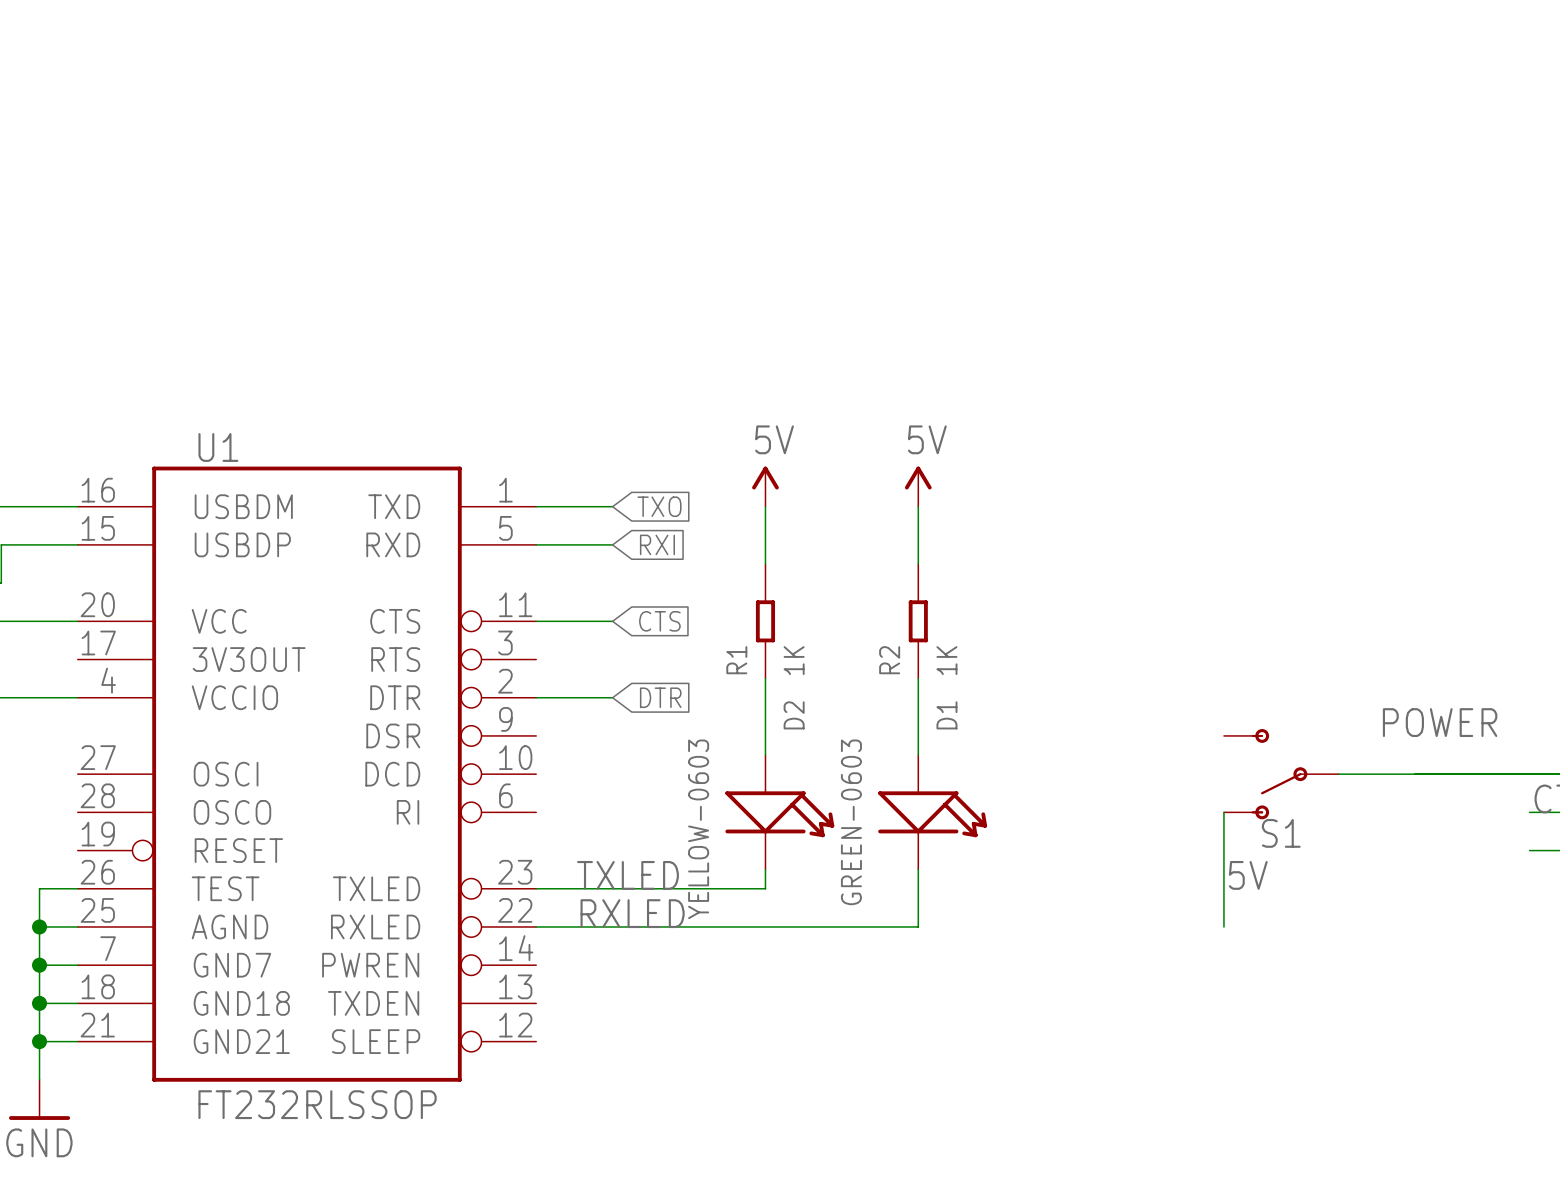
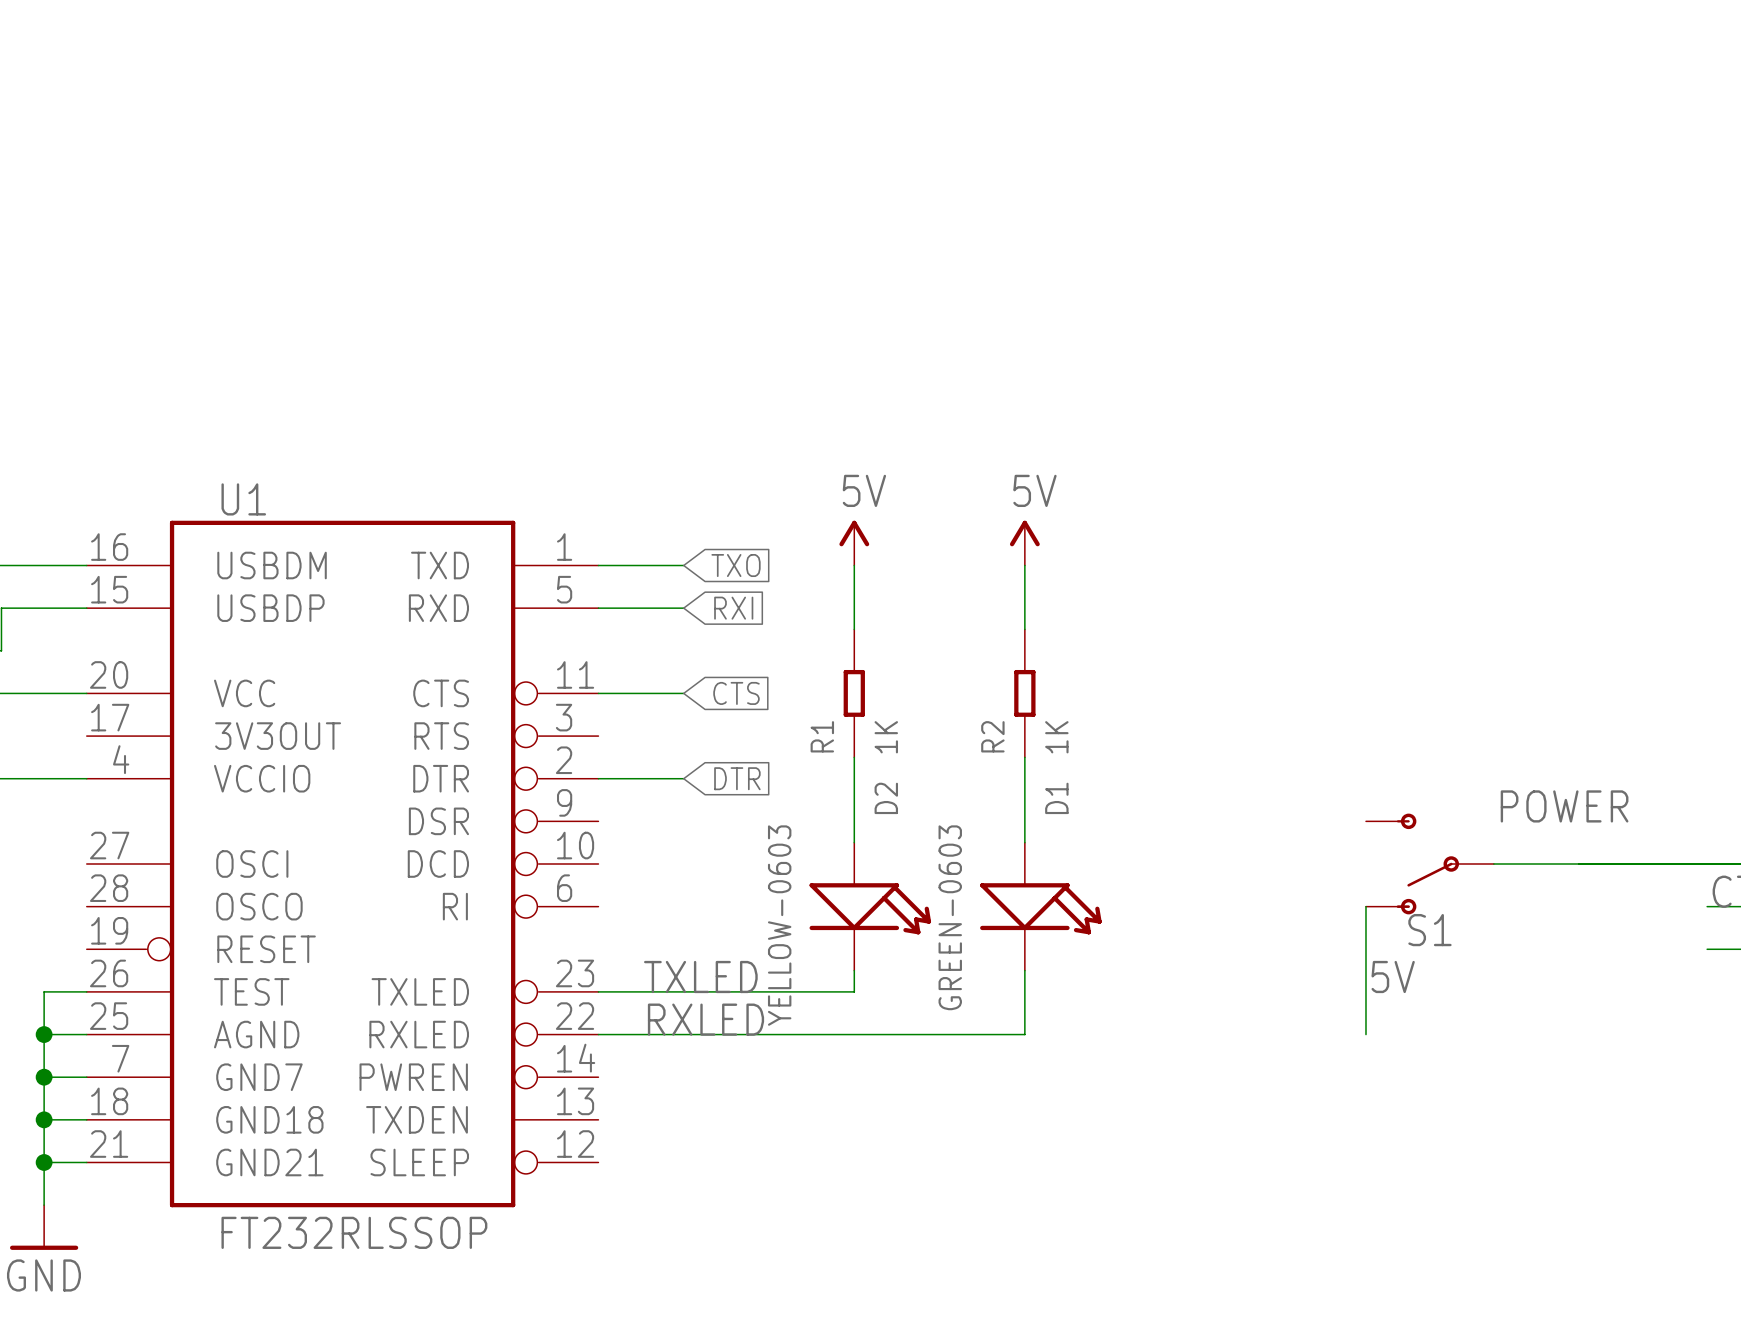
label position: POWER (1440, 722) -> POWER (1564, 806)

